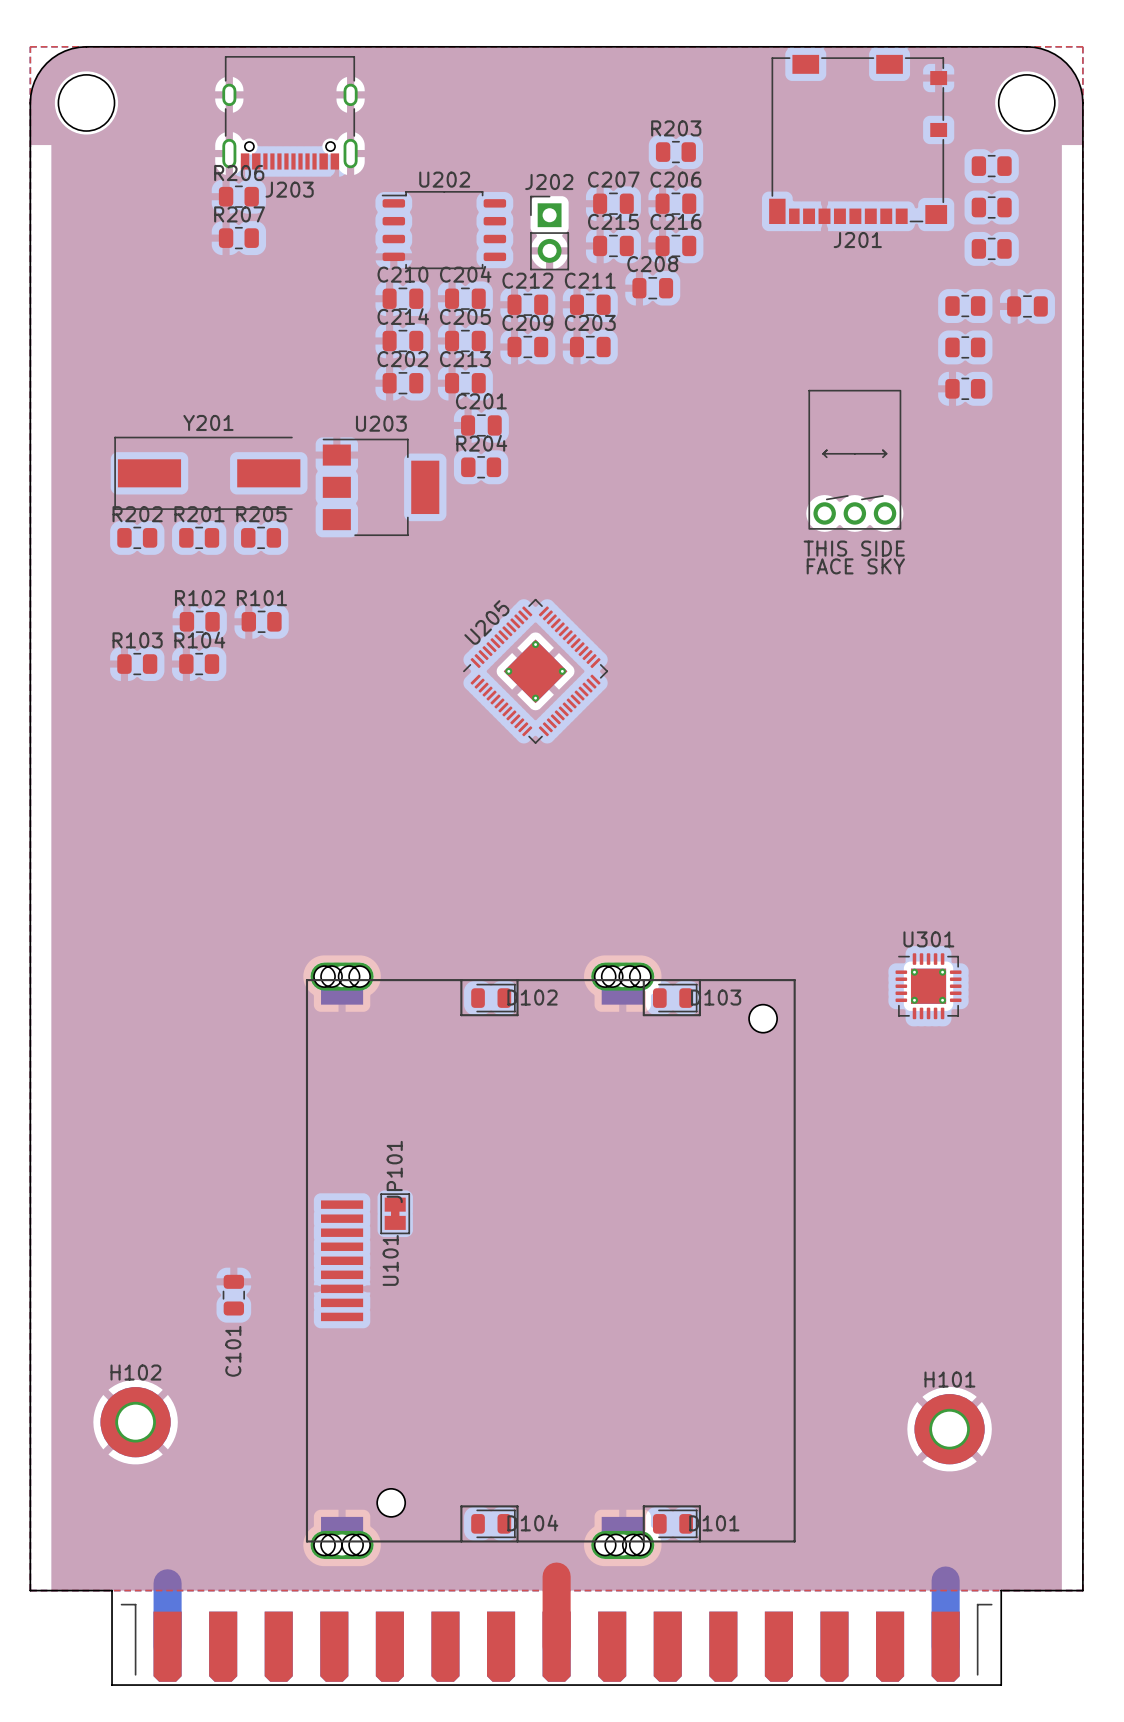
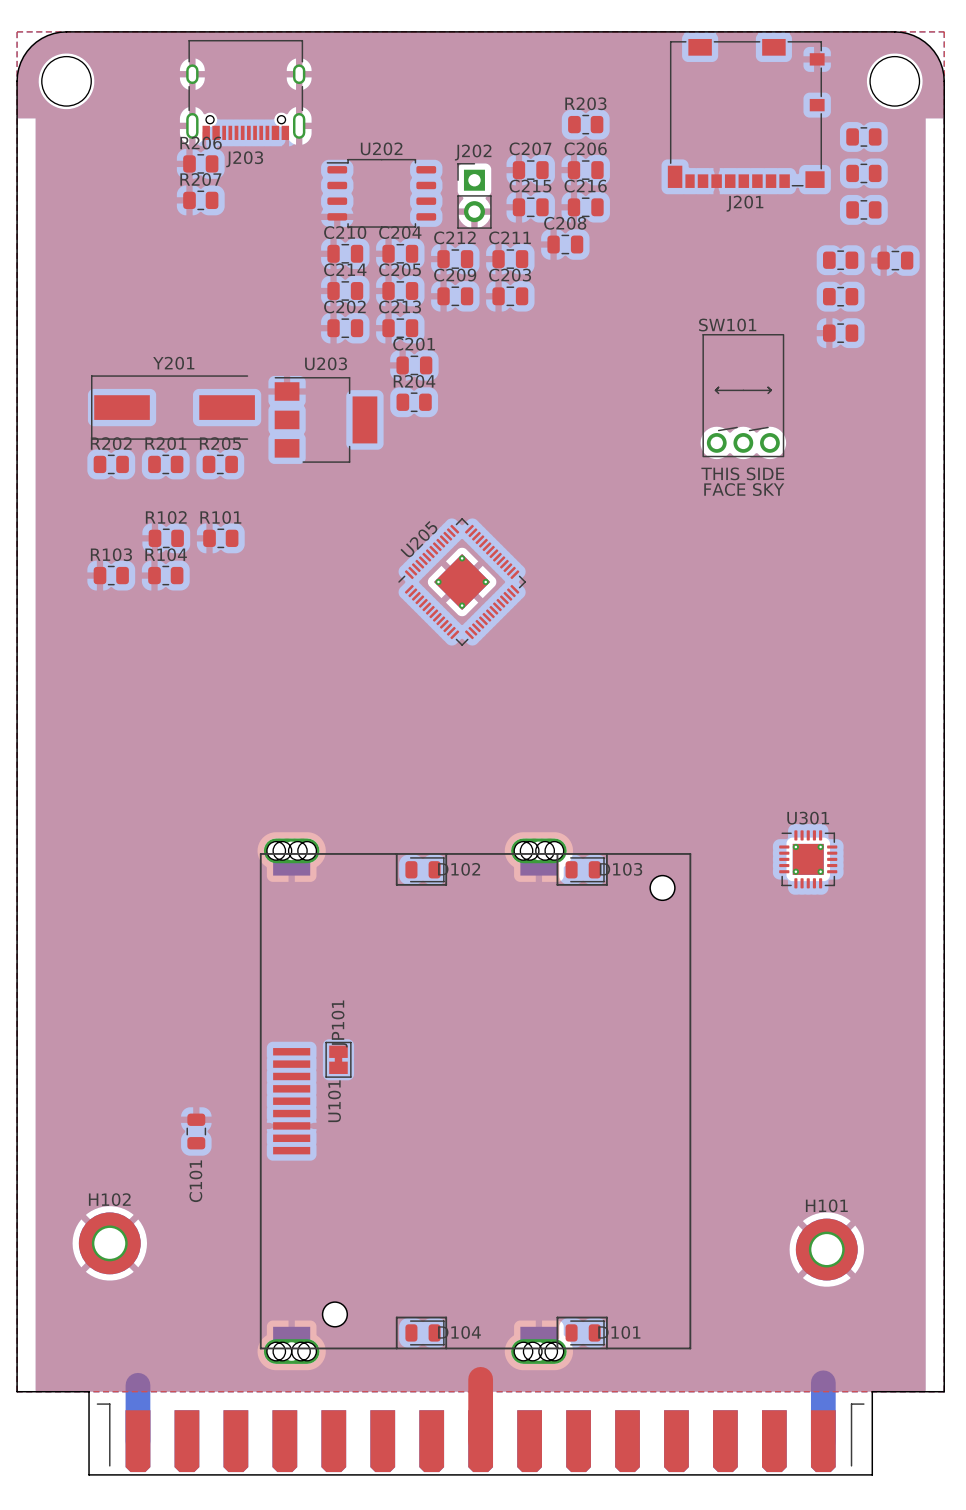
SW101 name: none -> SW101 (727, 325)

